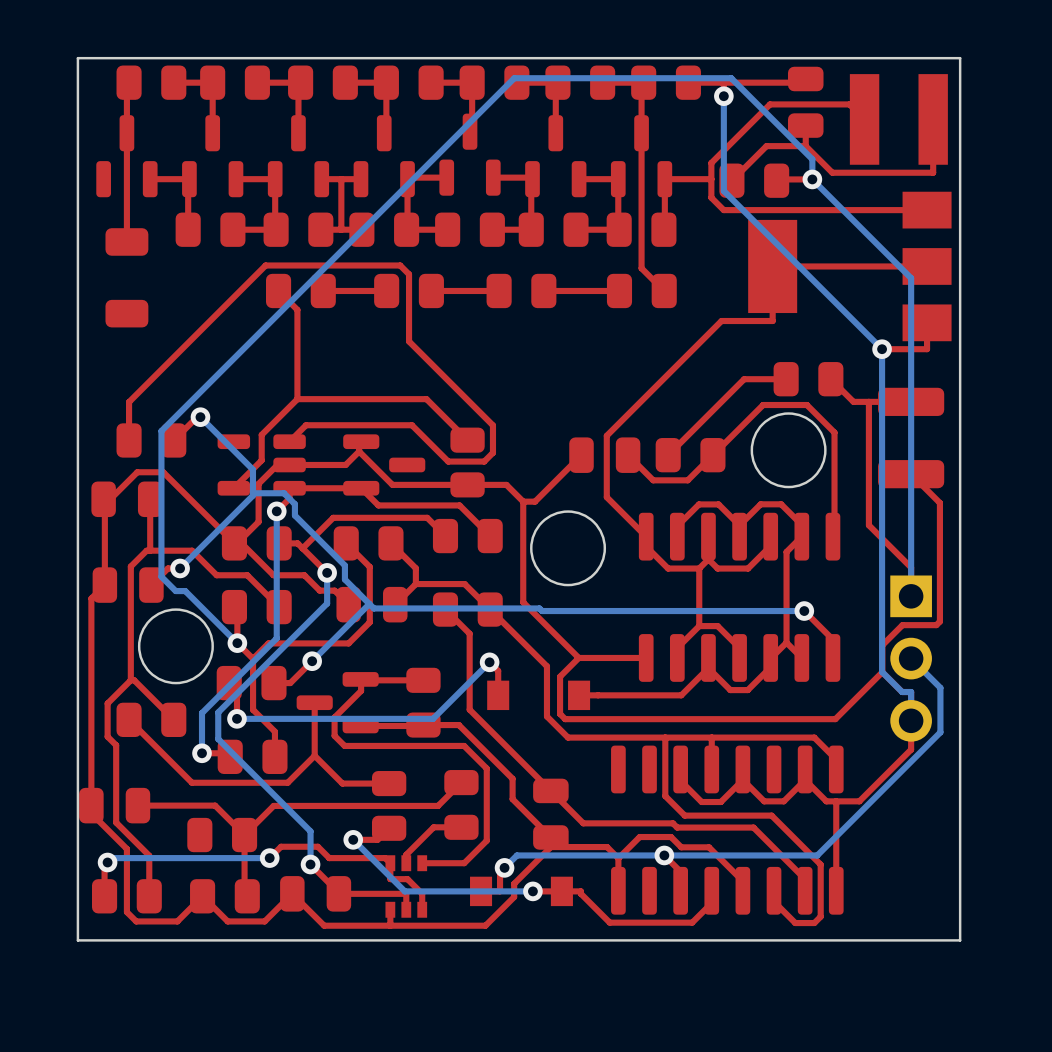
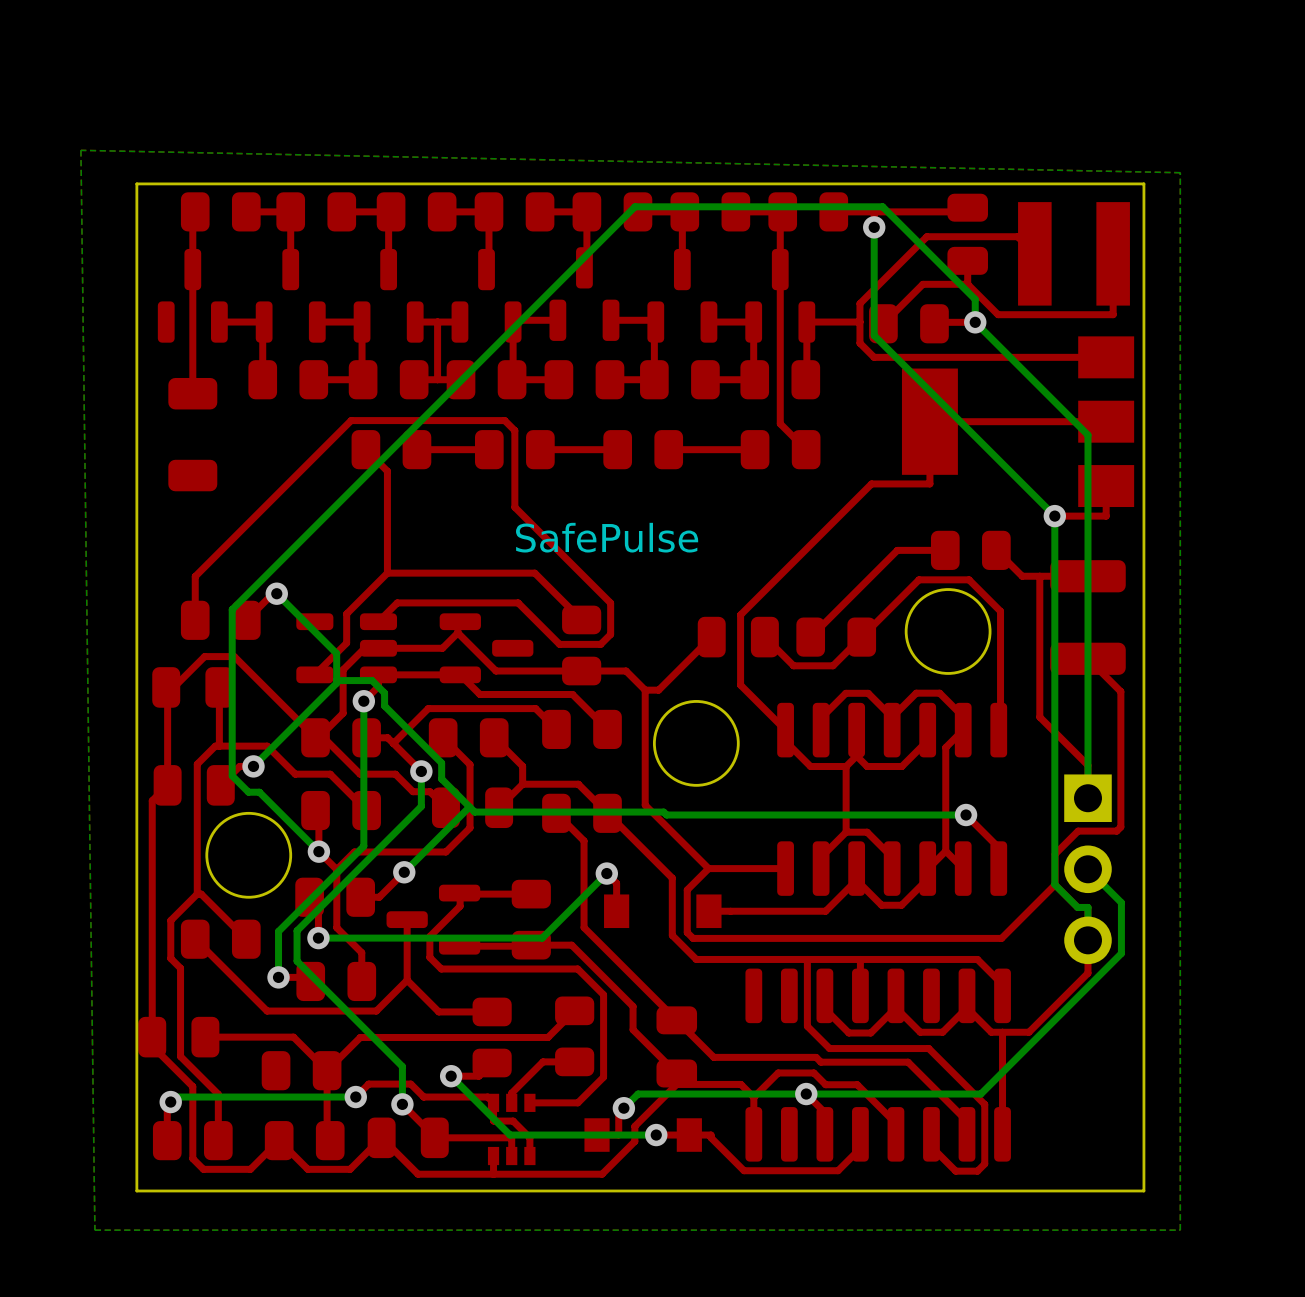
bottom zone outline: none -> (80, 150) (1180, 172) (1180, 1230) (94, 1230) (80, 150)
text: none -> SafePulse (607, 537)

